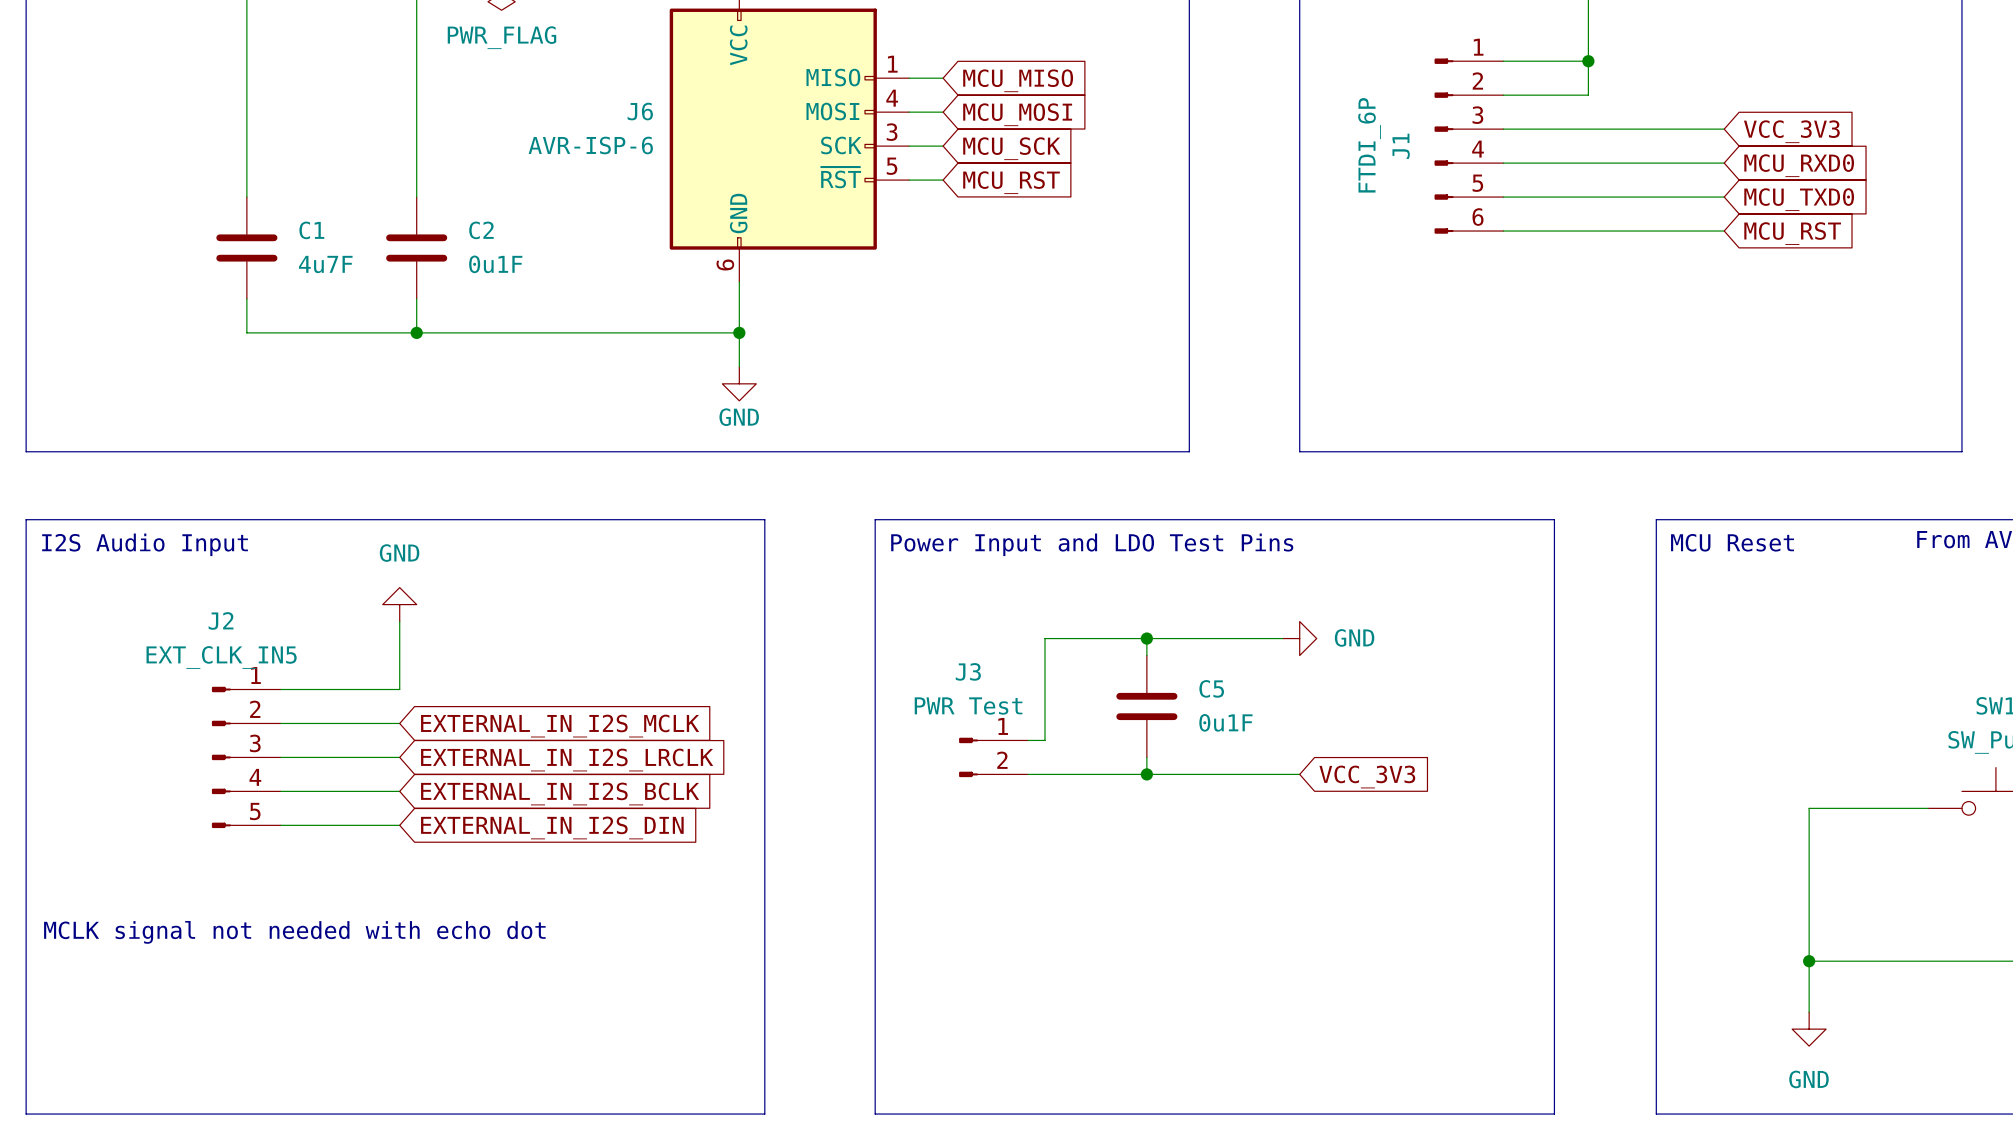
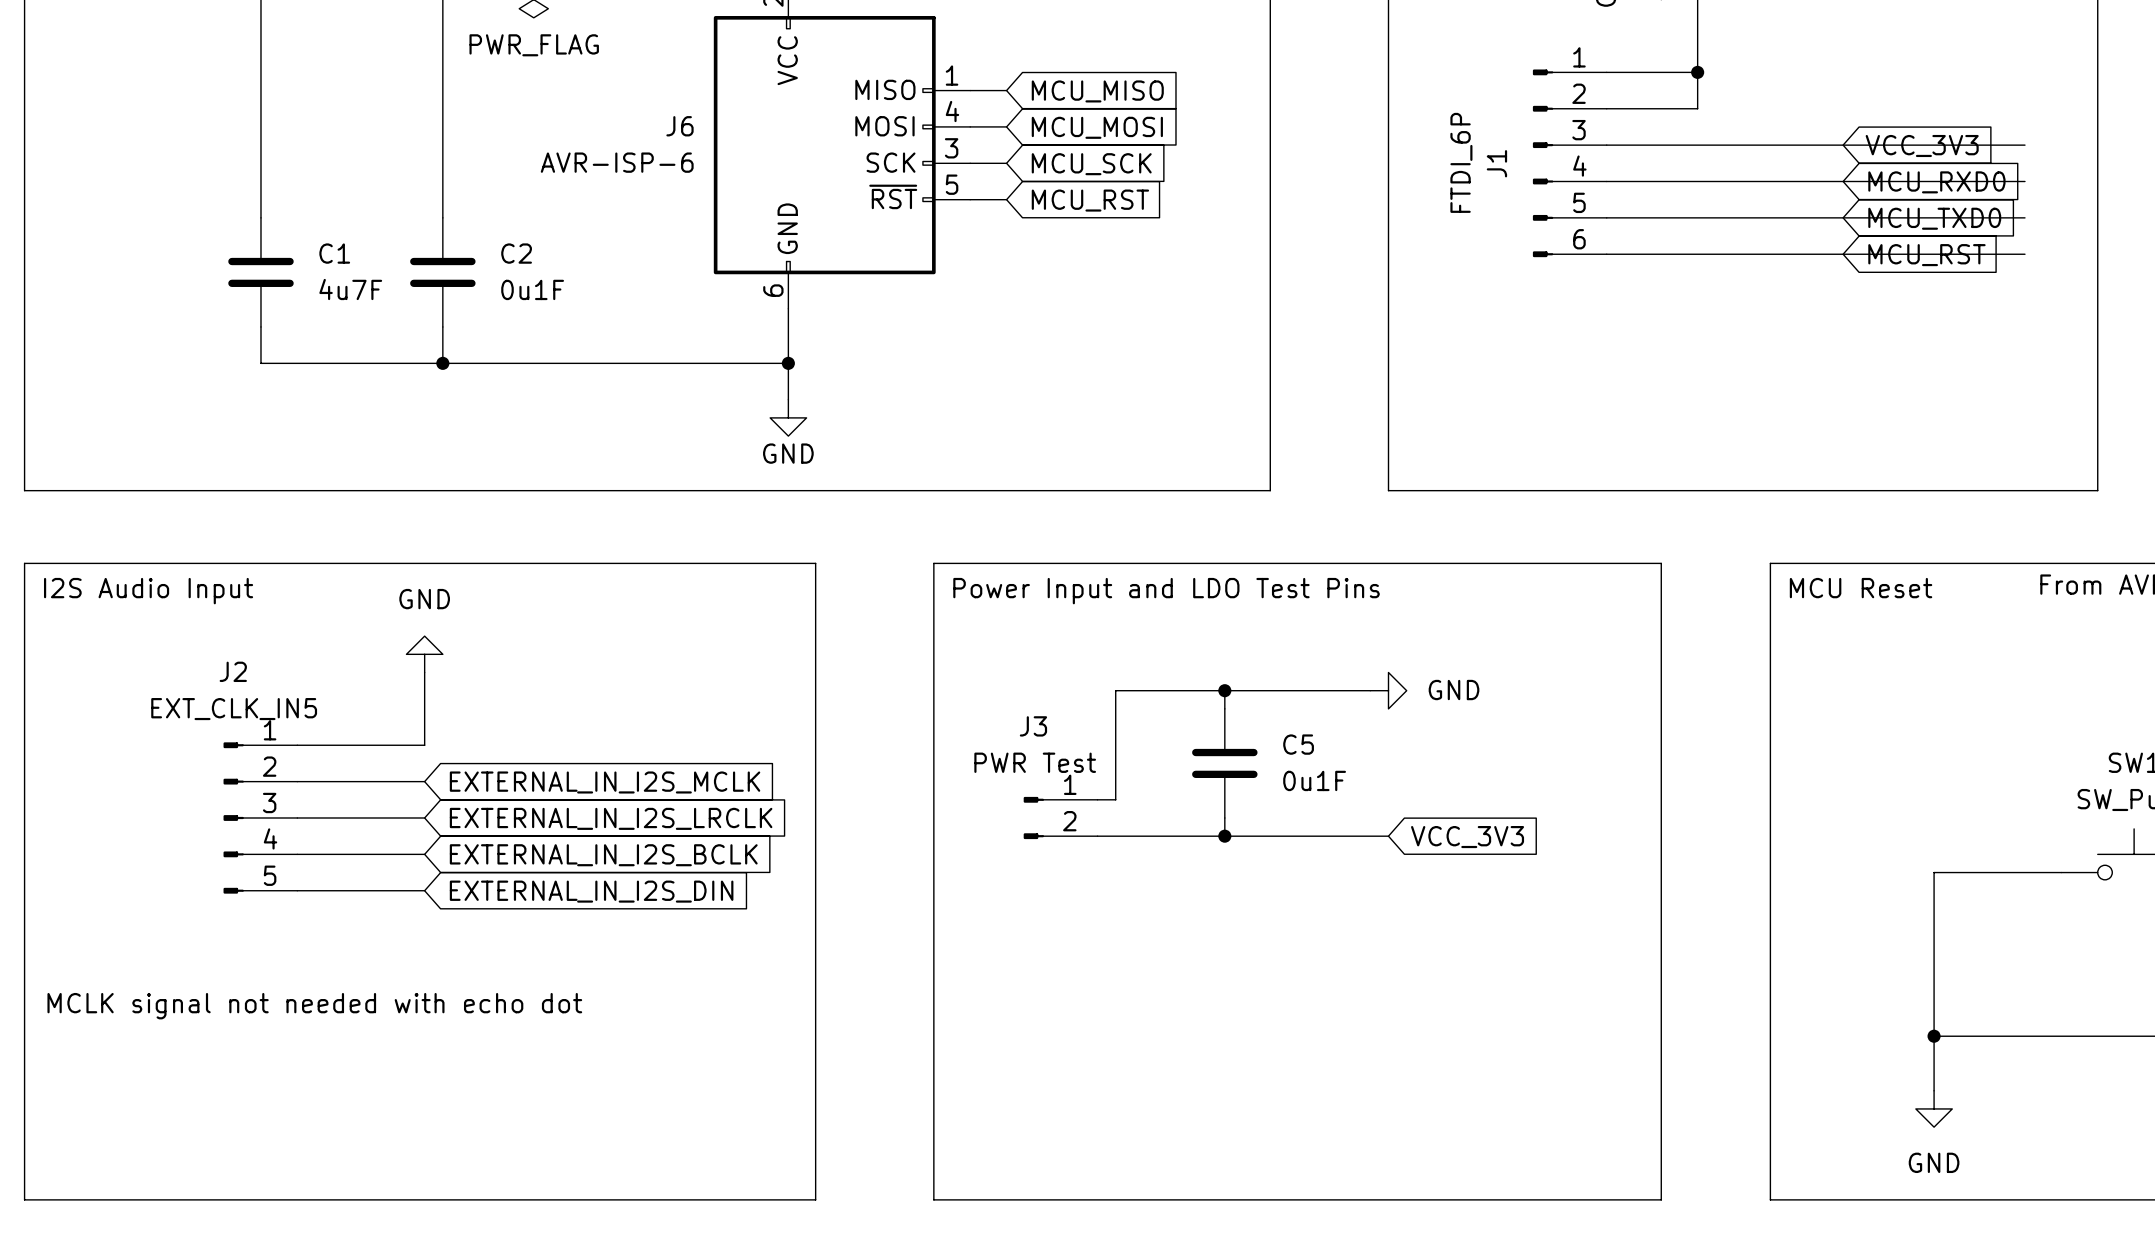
wire: none -> (1843, 145) (2024, 145)
wire: none -> (1843, 181) (2024, 181)
wire: none -> (1843, 217) (2024, 217)
wire: none -> (1843, 254) (2024, 254)

